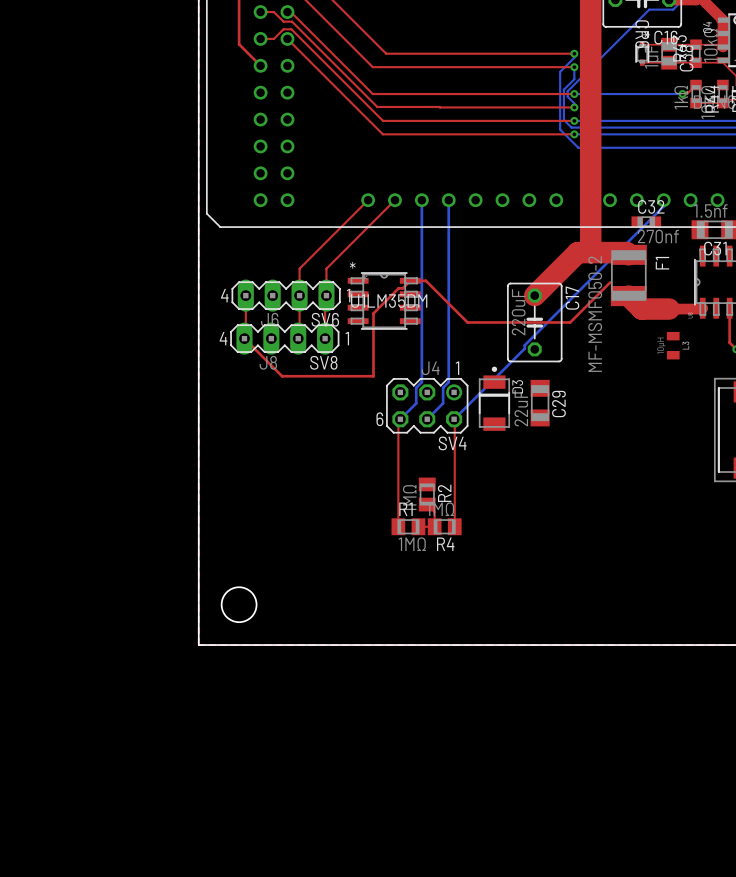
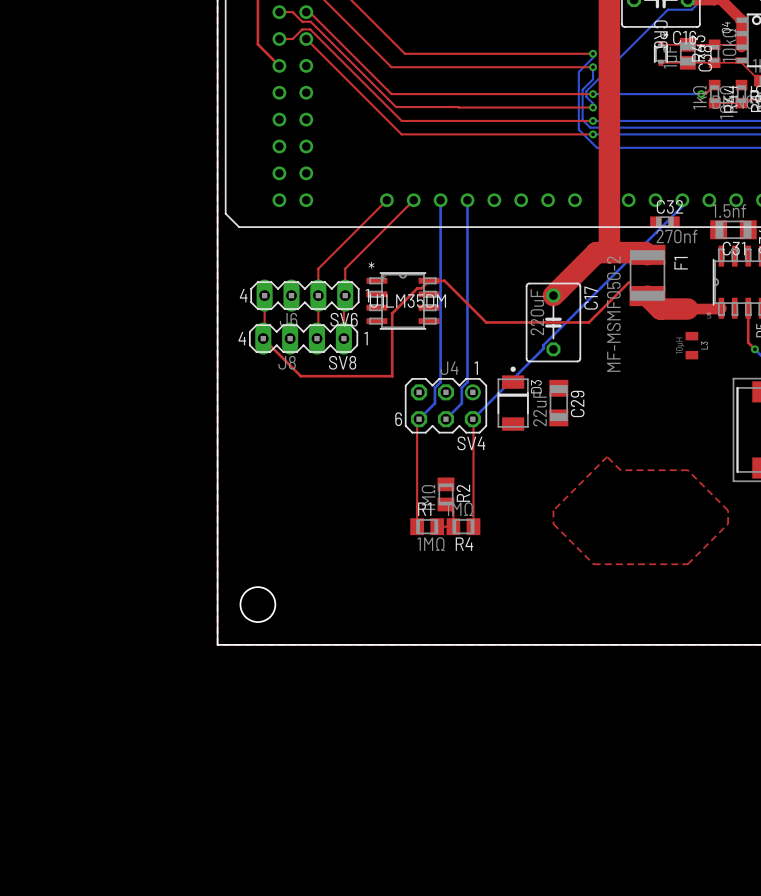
top zone outline: none -> (607, 456) (620, 470) (687, 470) (728, 510) (728, 523) (687, 564) (593, 564) (553, 523) (553, 510) (607, 456)

